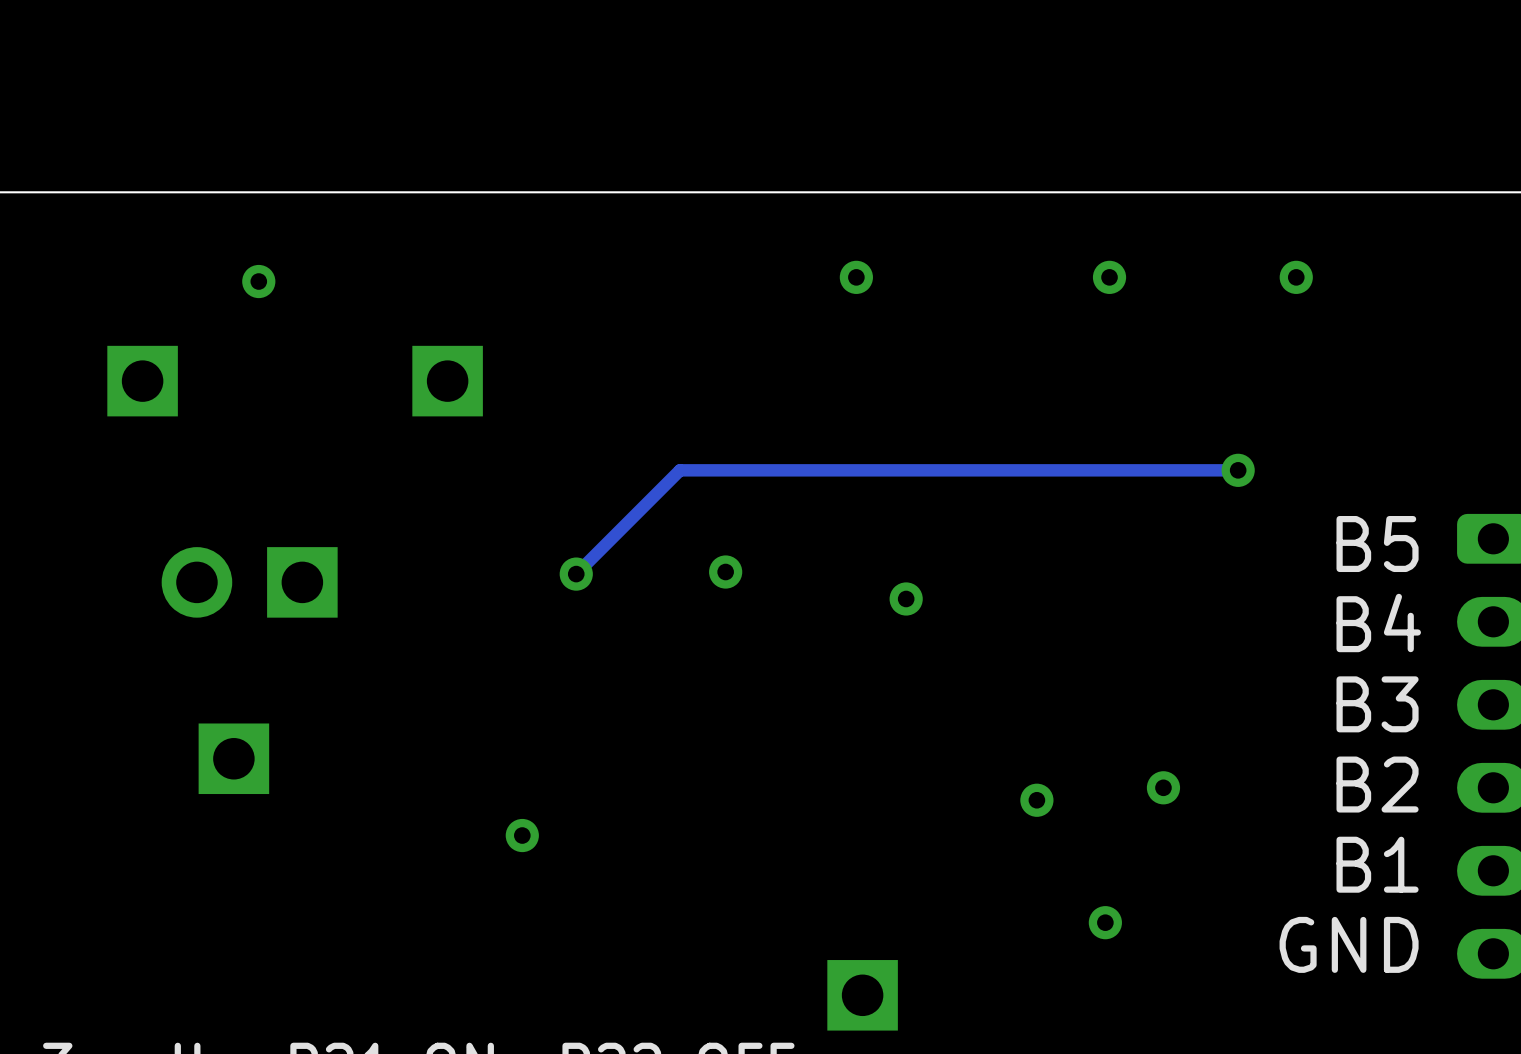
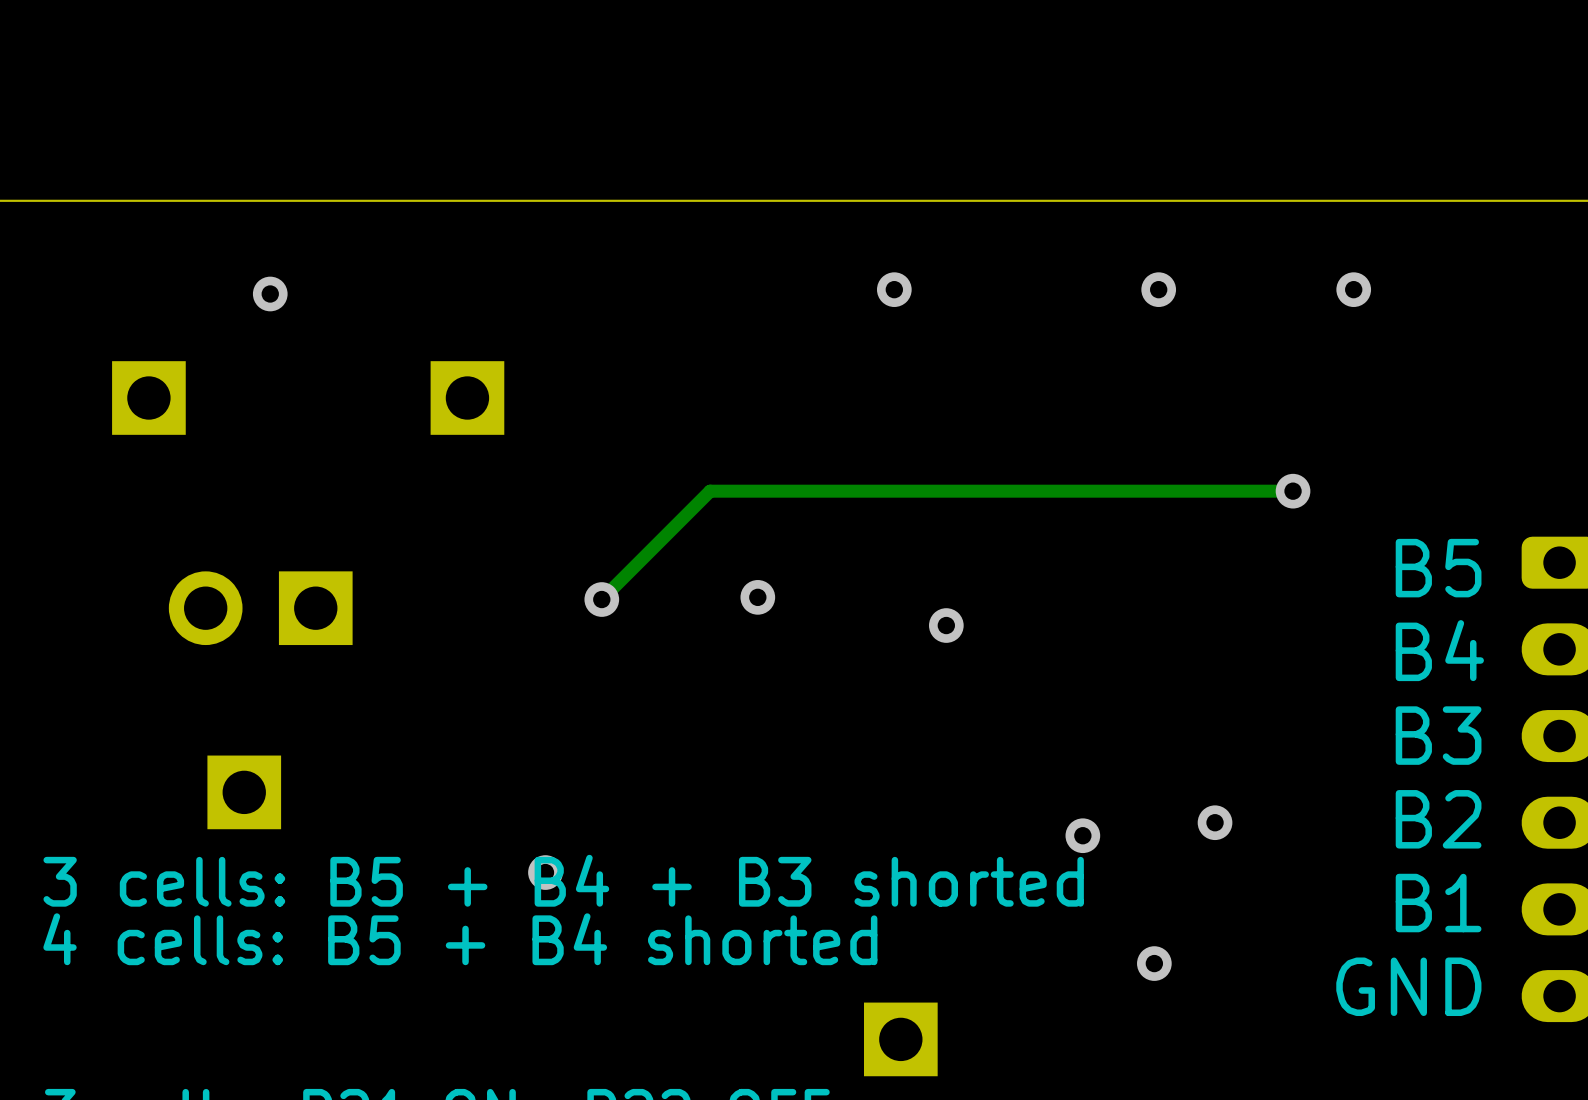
text: none -> 3 cells: B5 + B4 + B3 shorted (563, 880)
text: none -> 4 cells: B5 + B4 shorted (460, 939)

